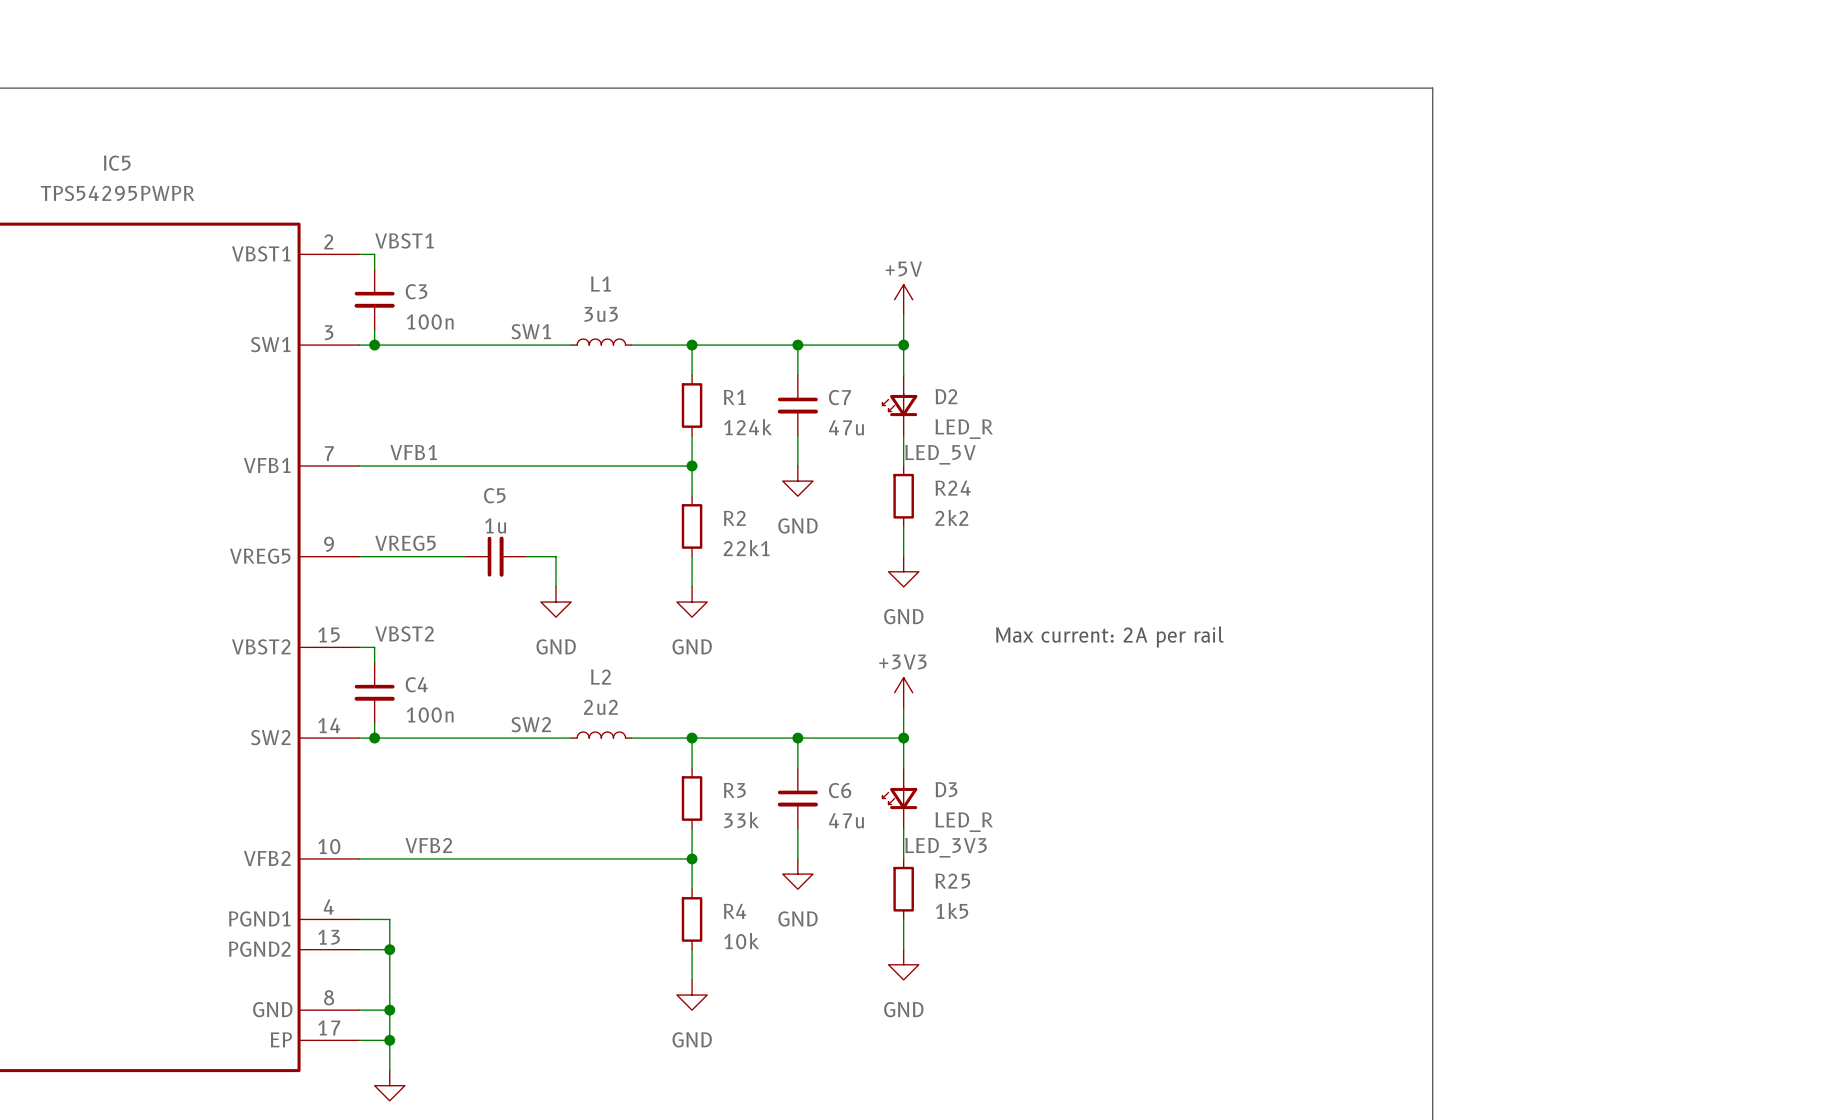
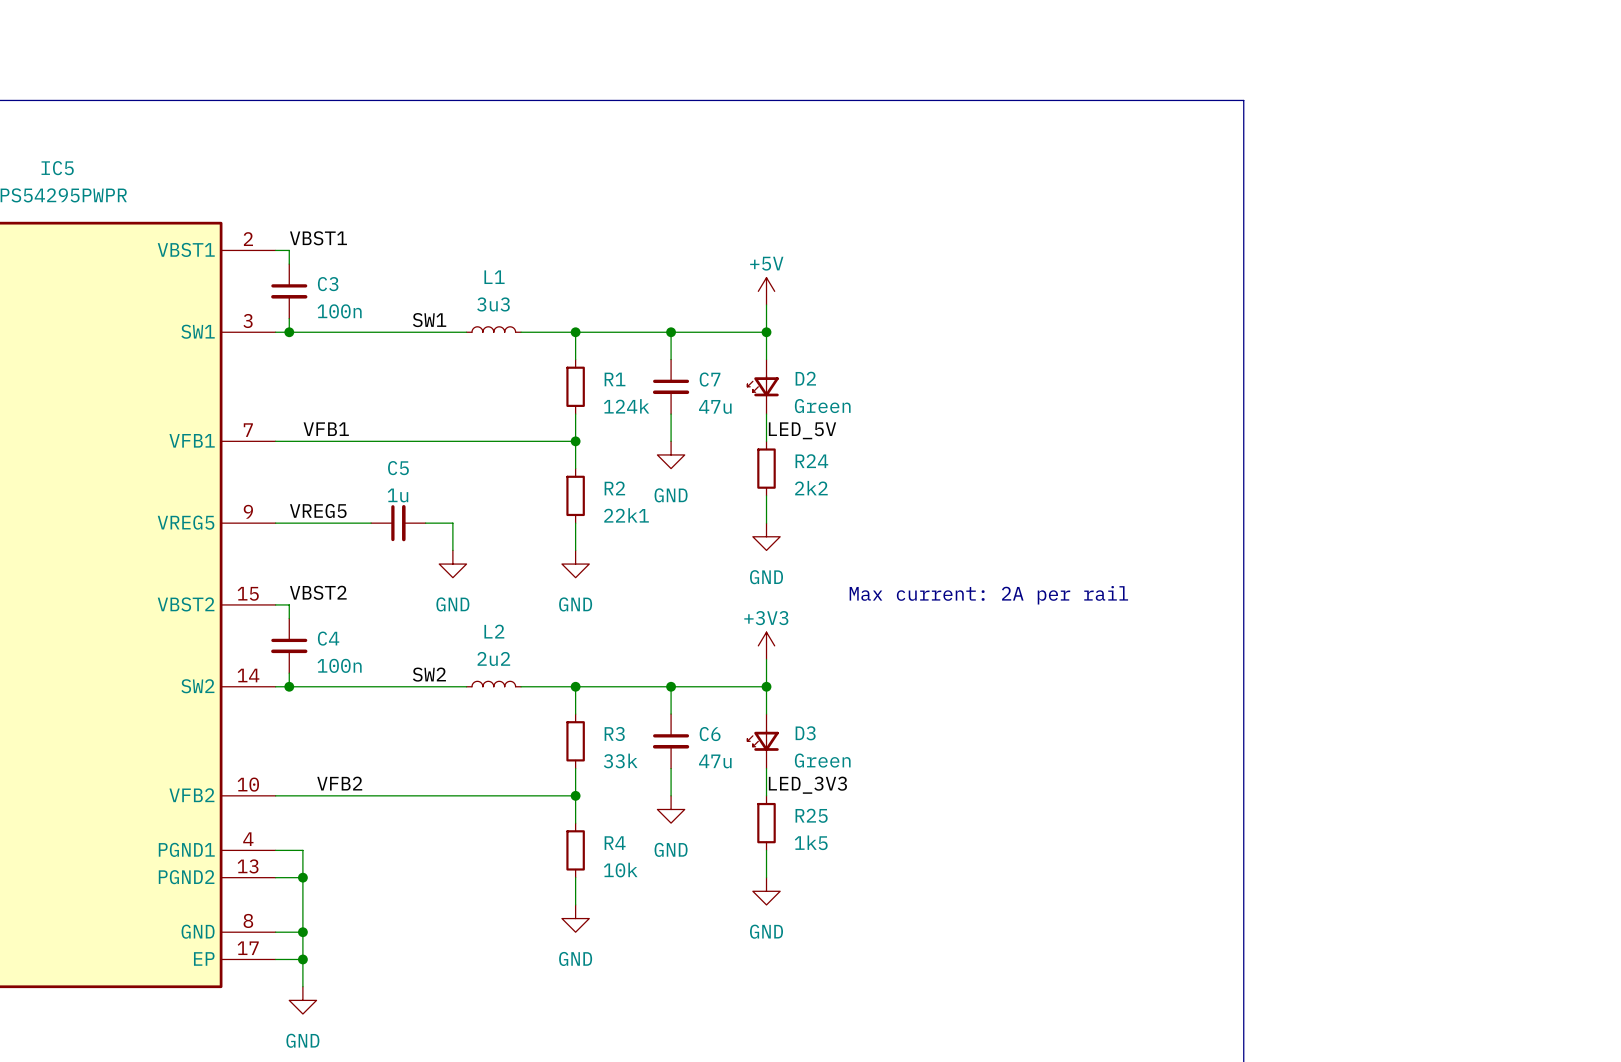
D2 value: LED_R (964, 429) -> Green (822, 406)
D3 value: LED_R (964, 822) -> Green (822, 760)

